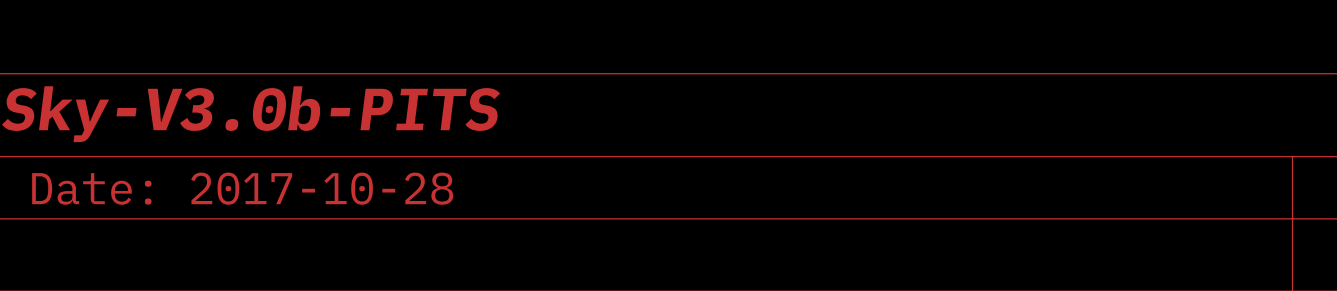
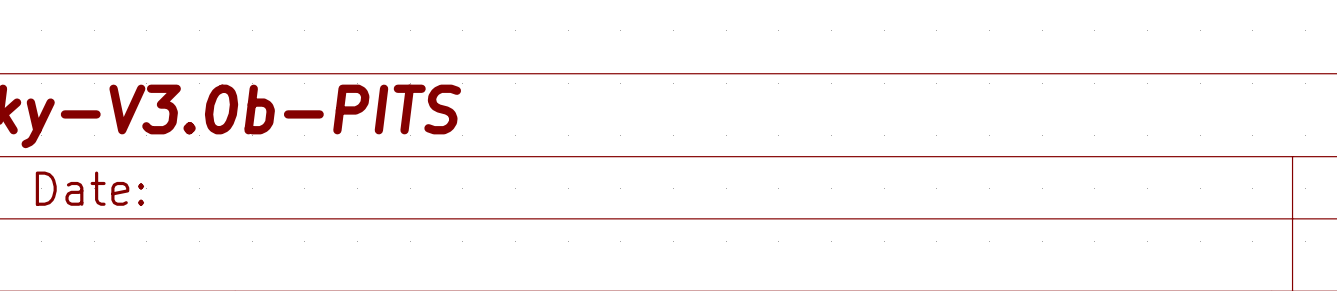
title block: Date: 2017-10-28 (242, 188) -> Date: (89, 188)

